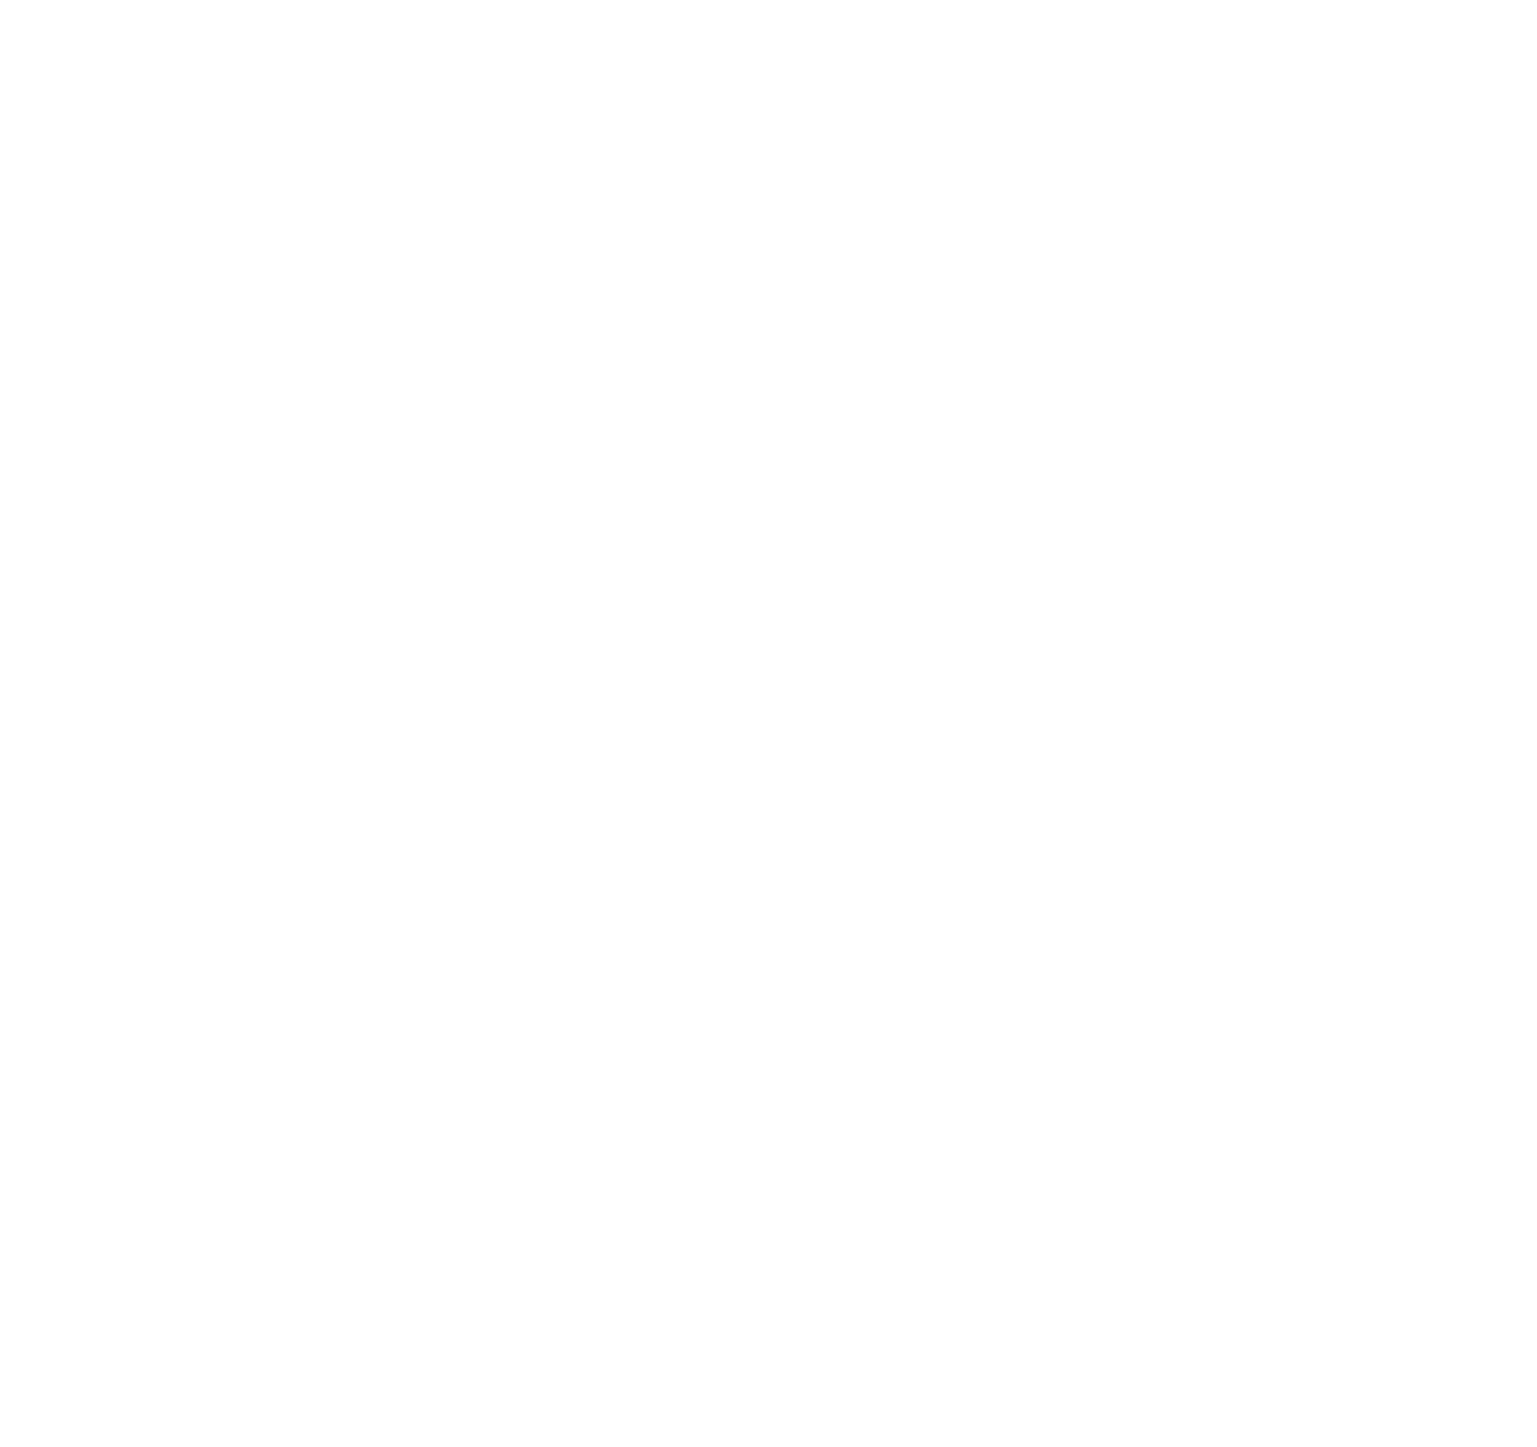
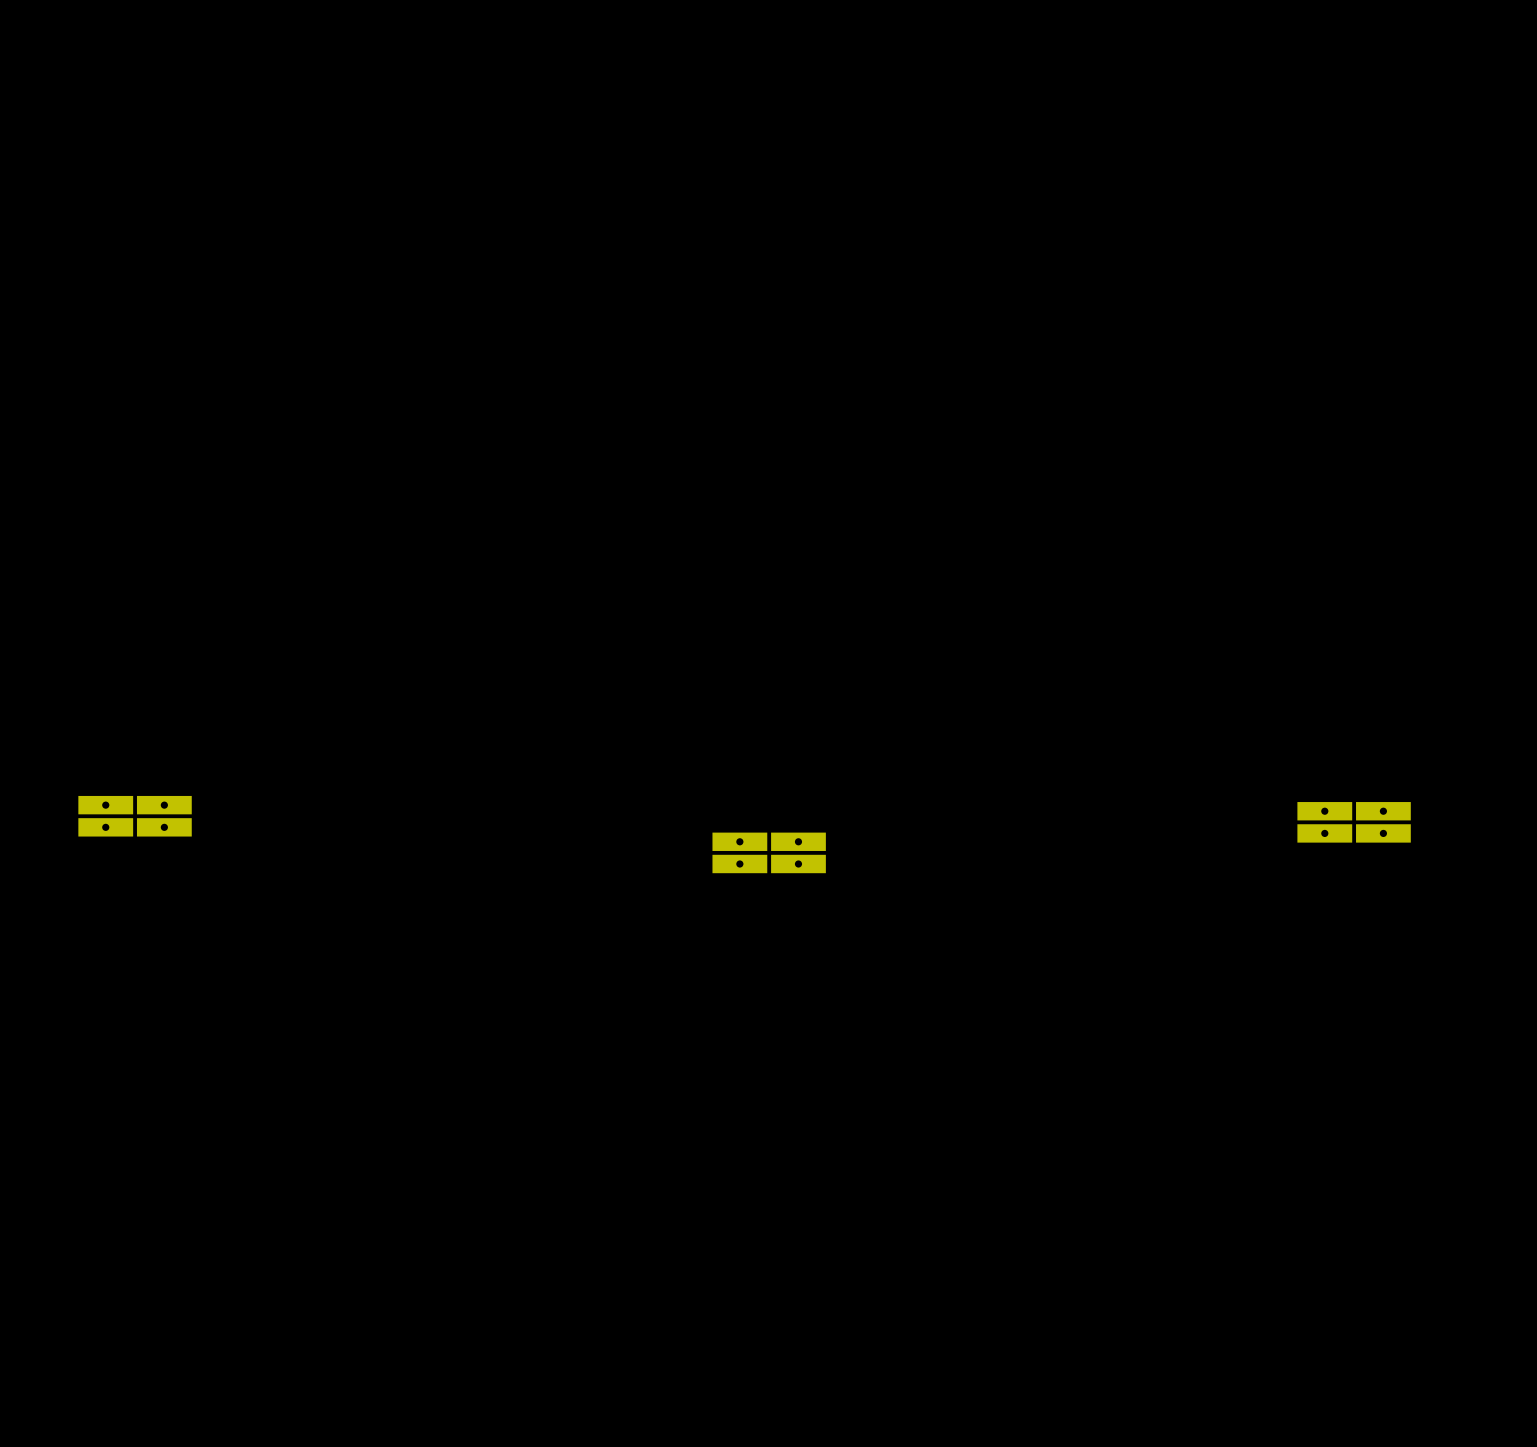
part: none -> (135, 816)
part: none -> (1354, 822)
part: none -> (769, 852)

